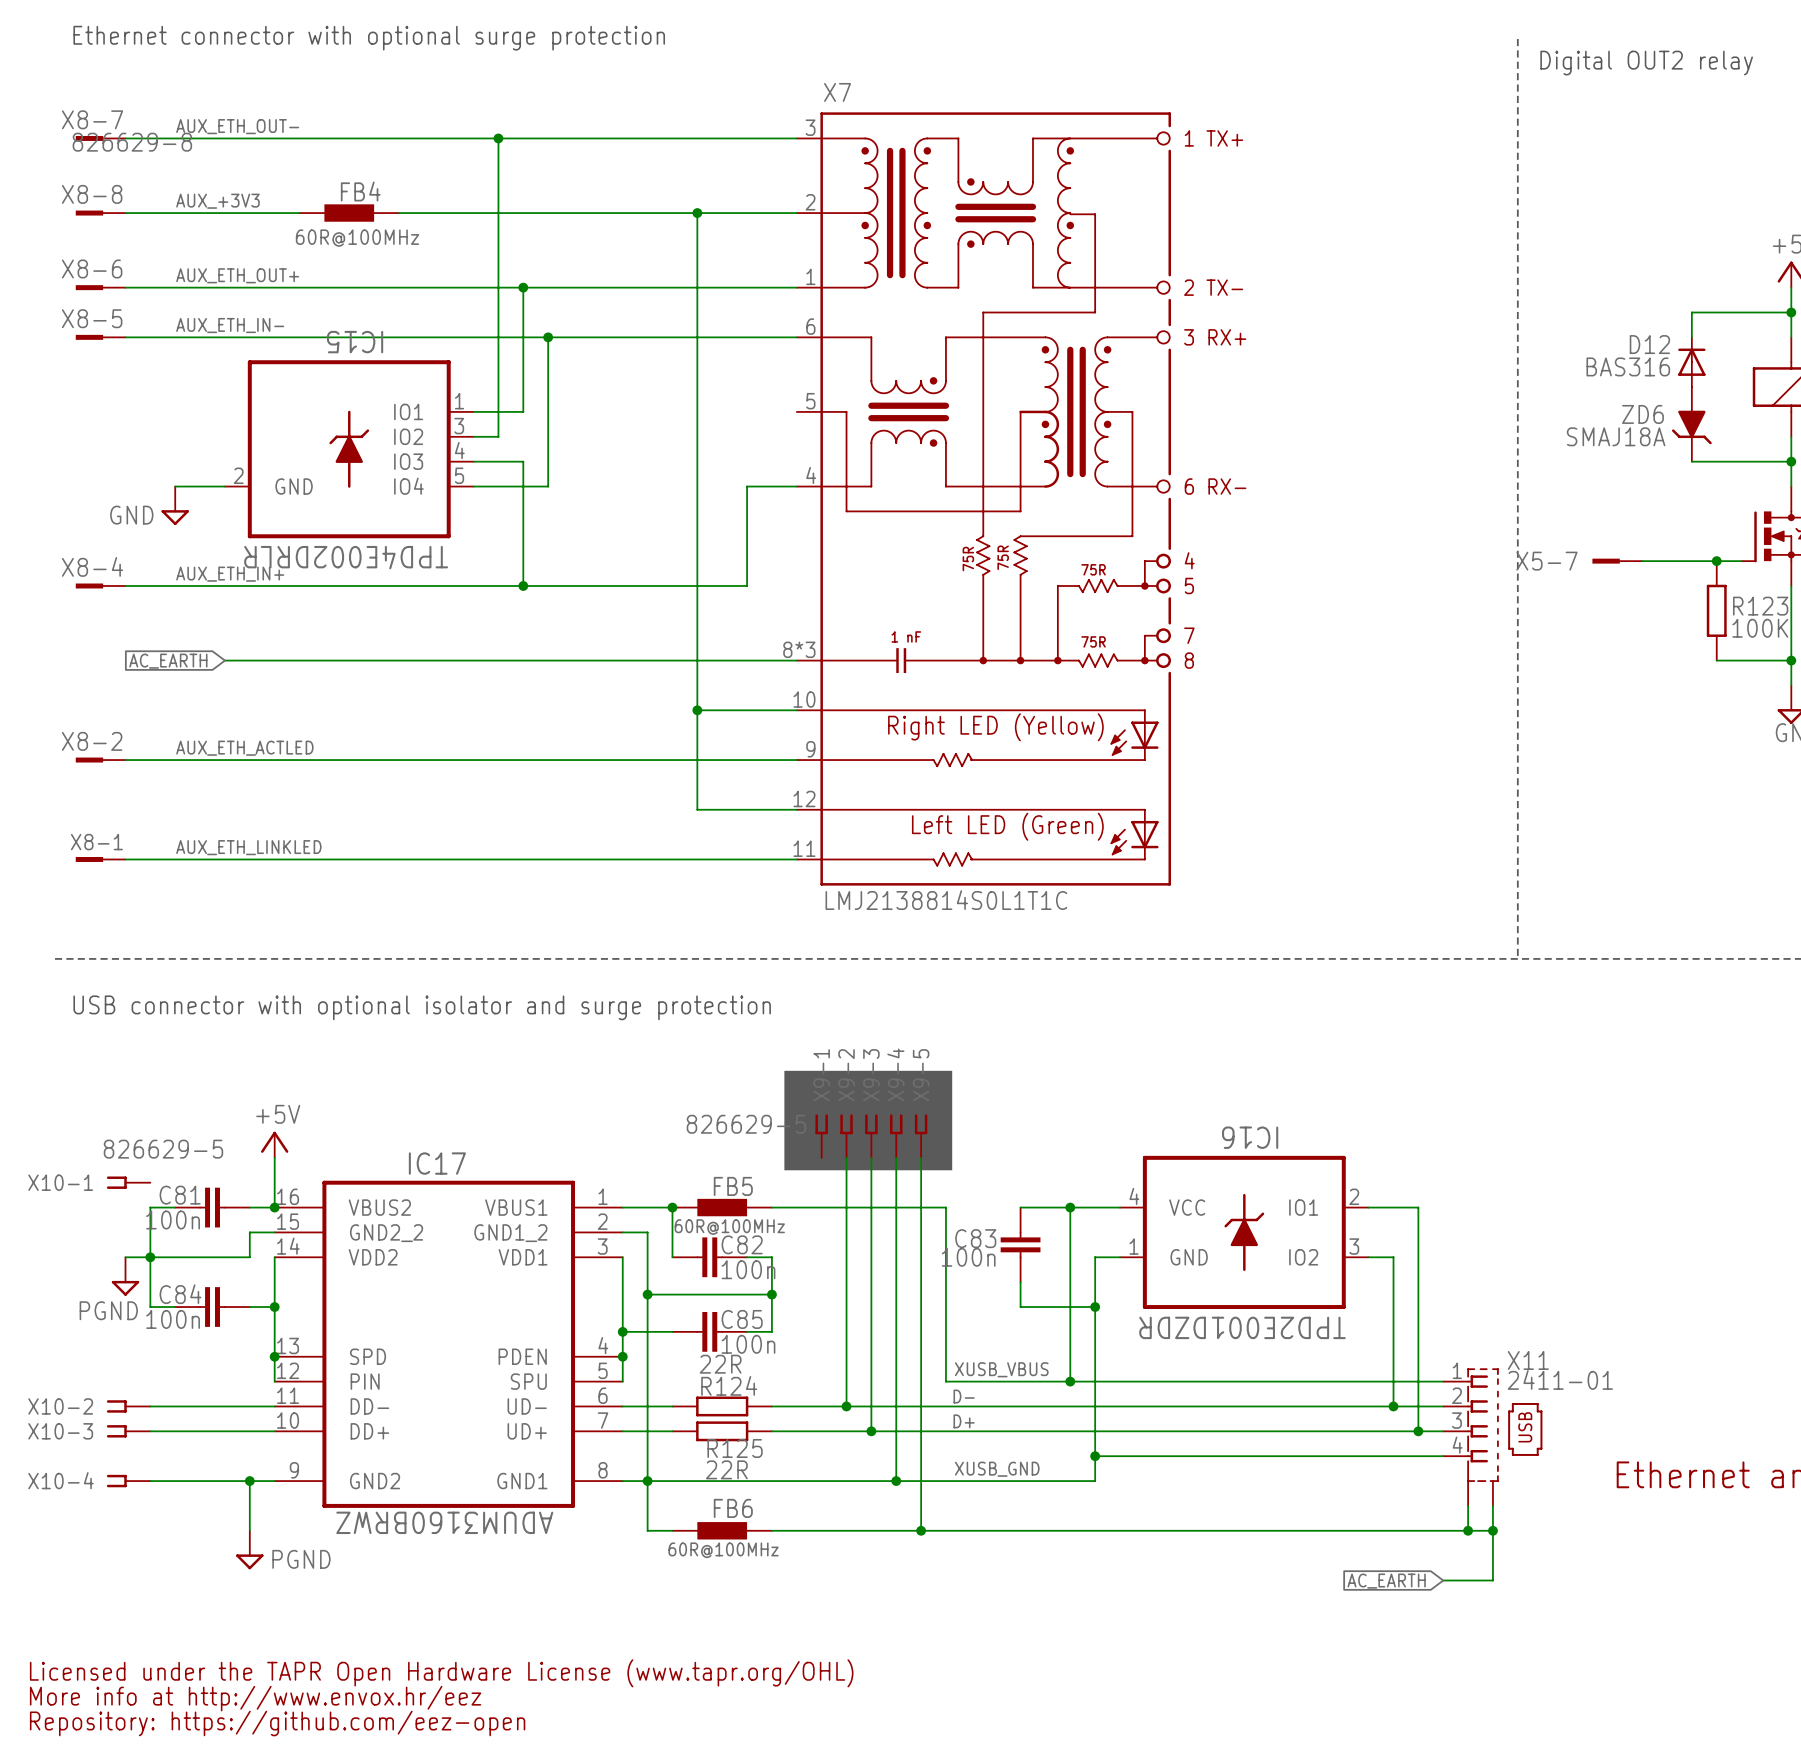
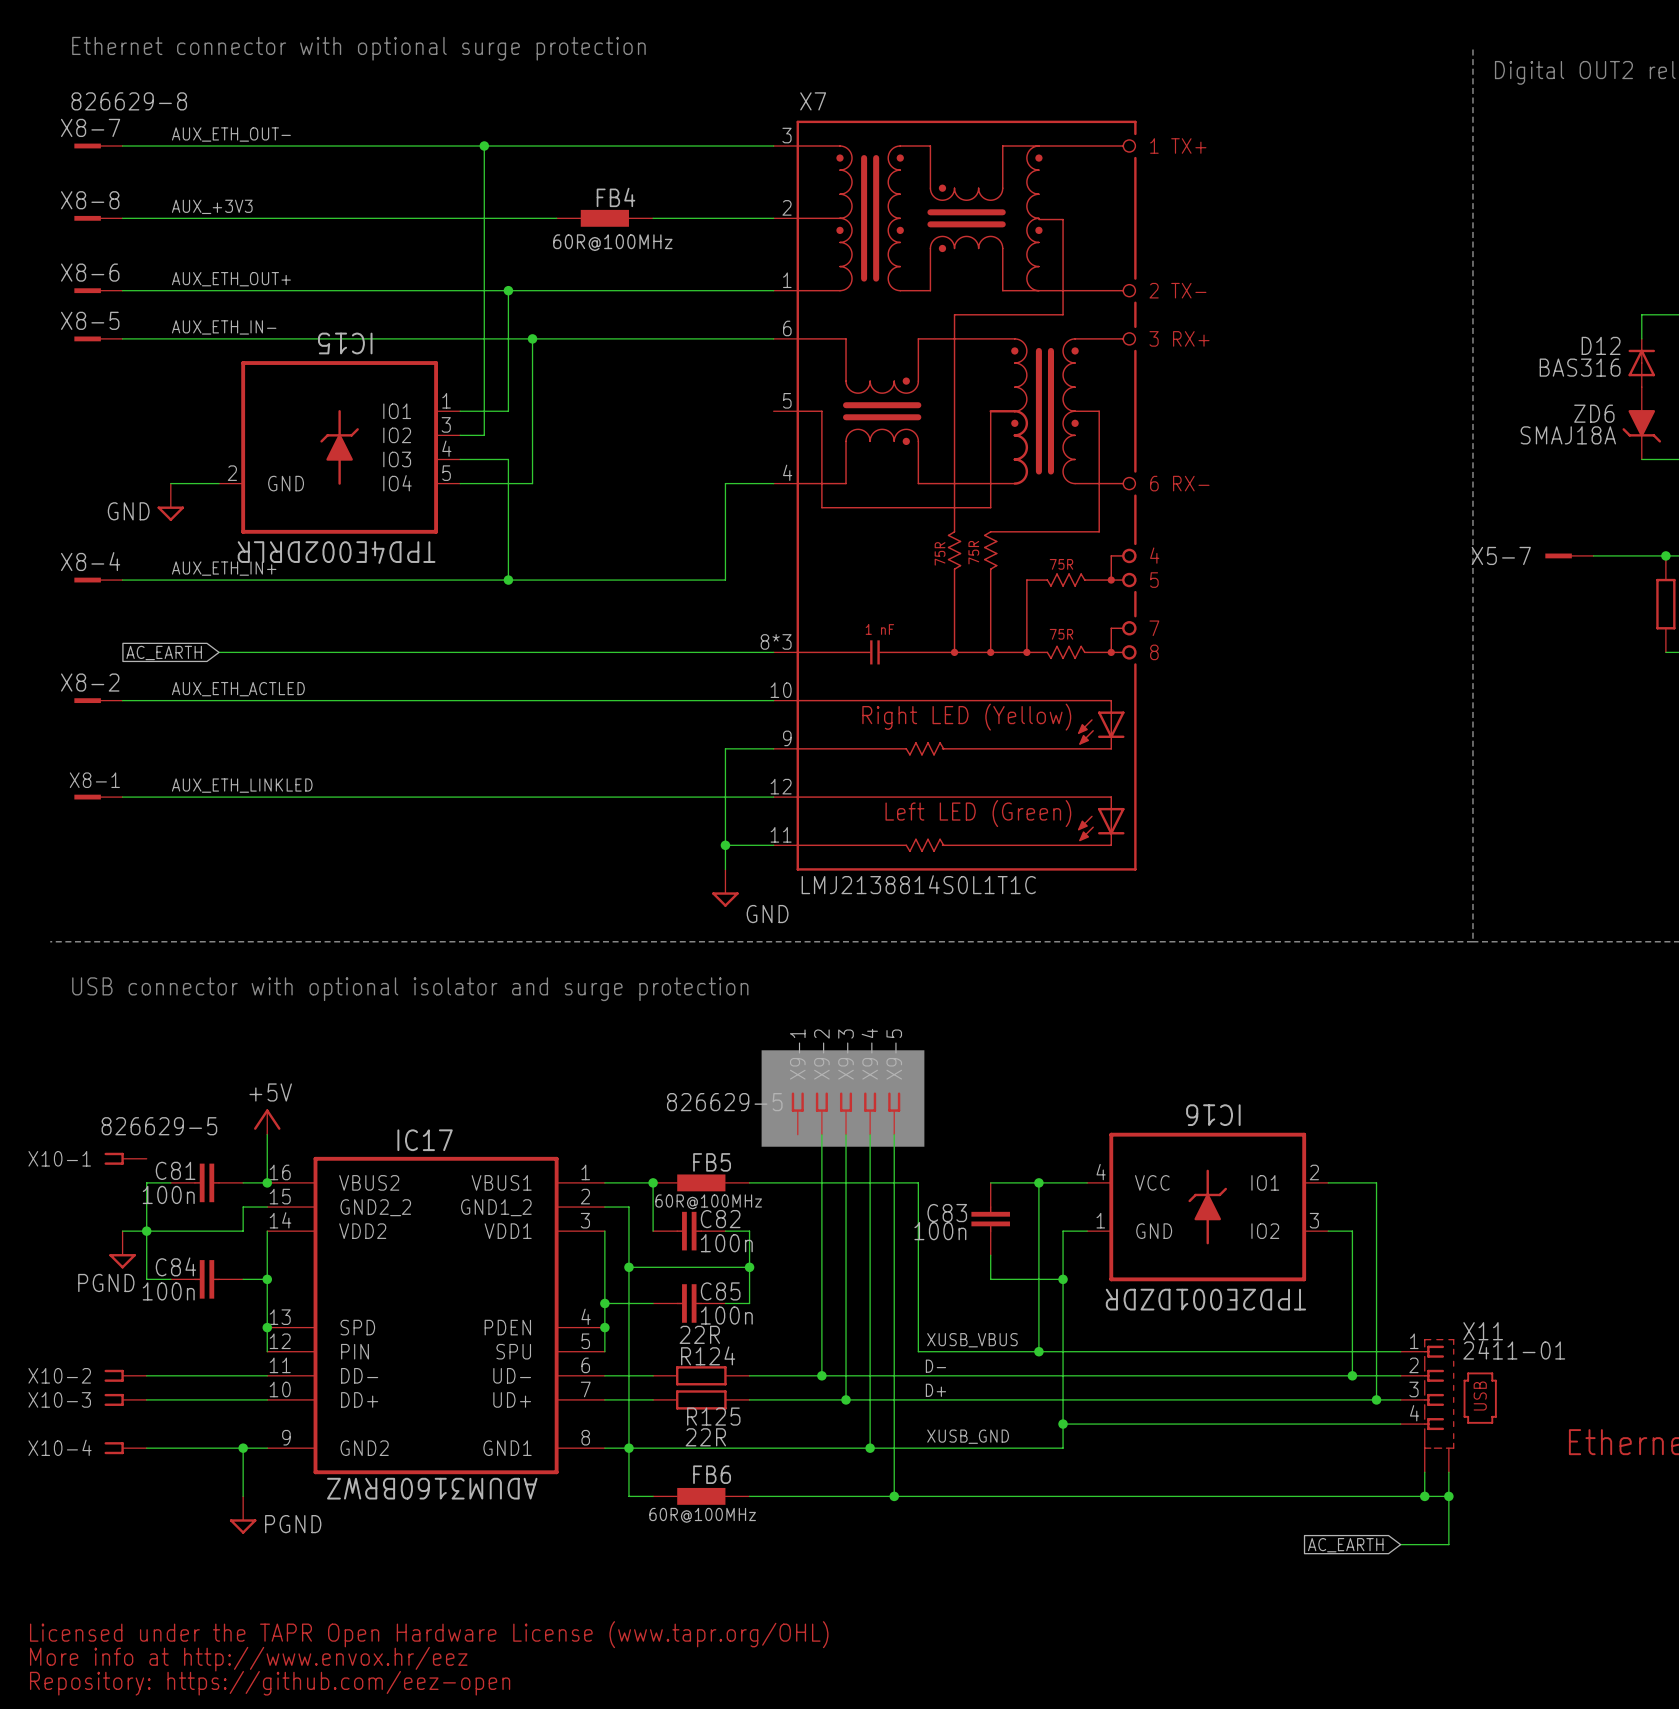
FB4 position: (349, 213) -> (604, 218)
wire: (697, 213) (697, 809) -> (122, 797) (677, 797)
junction: (697, 213) -> none
wire: none -> (122, 700) (677, 700)
junction: (697, 710) -> none
label position: AUX_ETH_ACTLED (244, 748) -> AUX_ETH_ACTLED (238, 689)
X8-2 position: (100, 760) -> (98, 700)
wire: (125, 760) (747, 760) -> (725, 869) (725, 748)
label position: AUX_ETH_LINKLED (248, 847) -> AUX_ETH_LINKLED (242, 785)
X8-1 position: (100, 859) -> (98, 797)
wire: (125, 859) (747, 859) -> none
junction: none -> (725, 845)
power symbol: none -> GND (725, 888)

